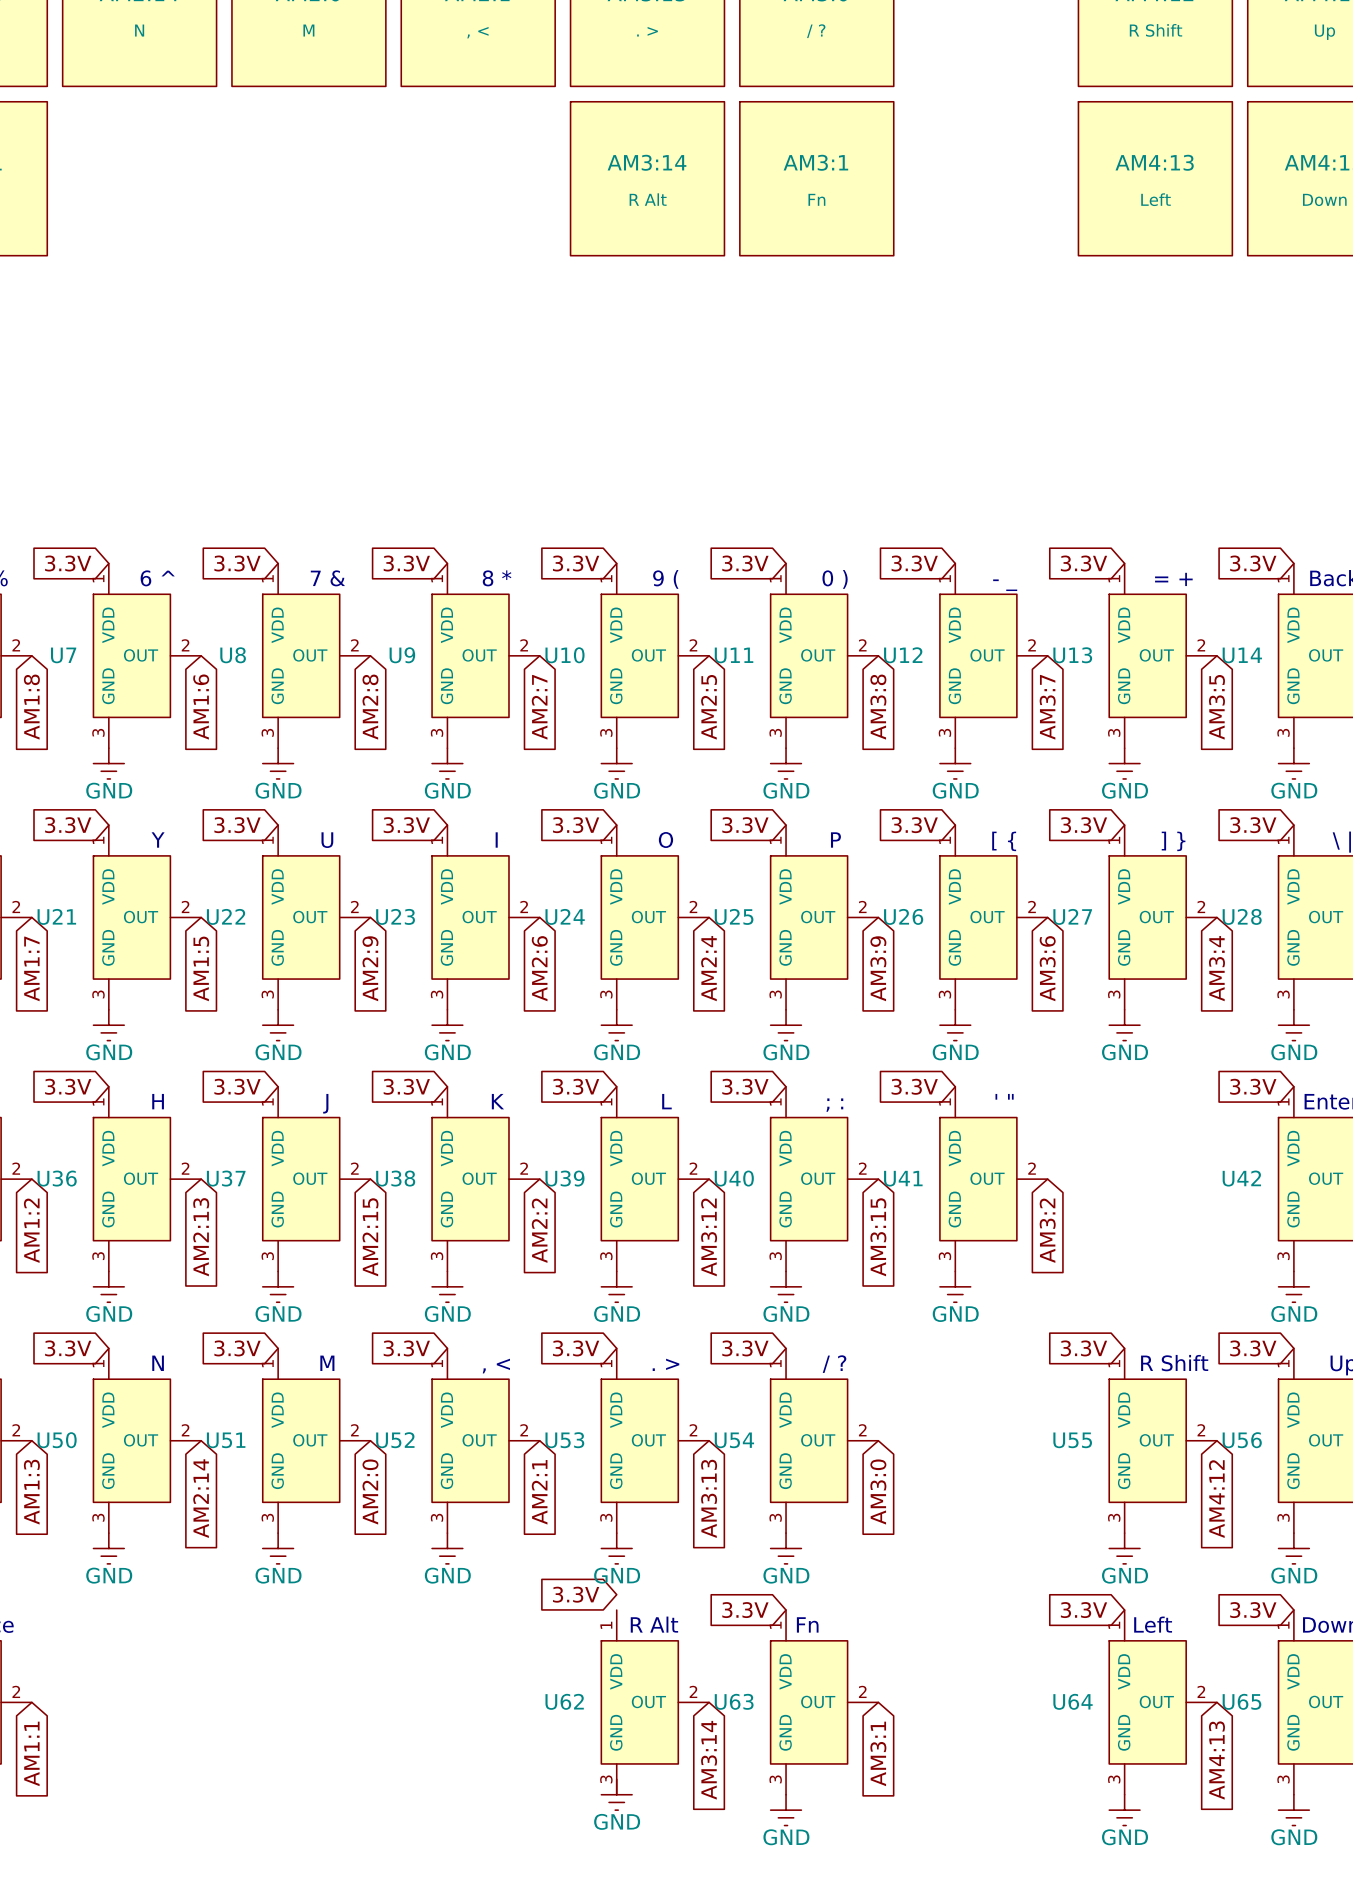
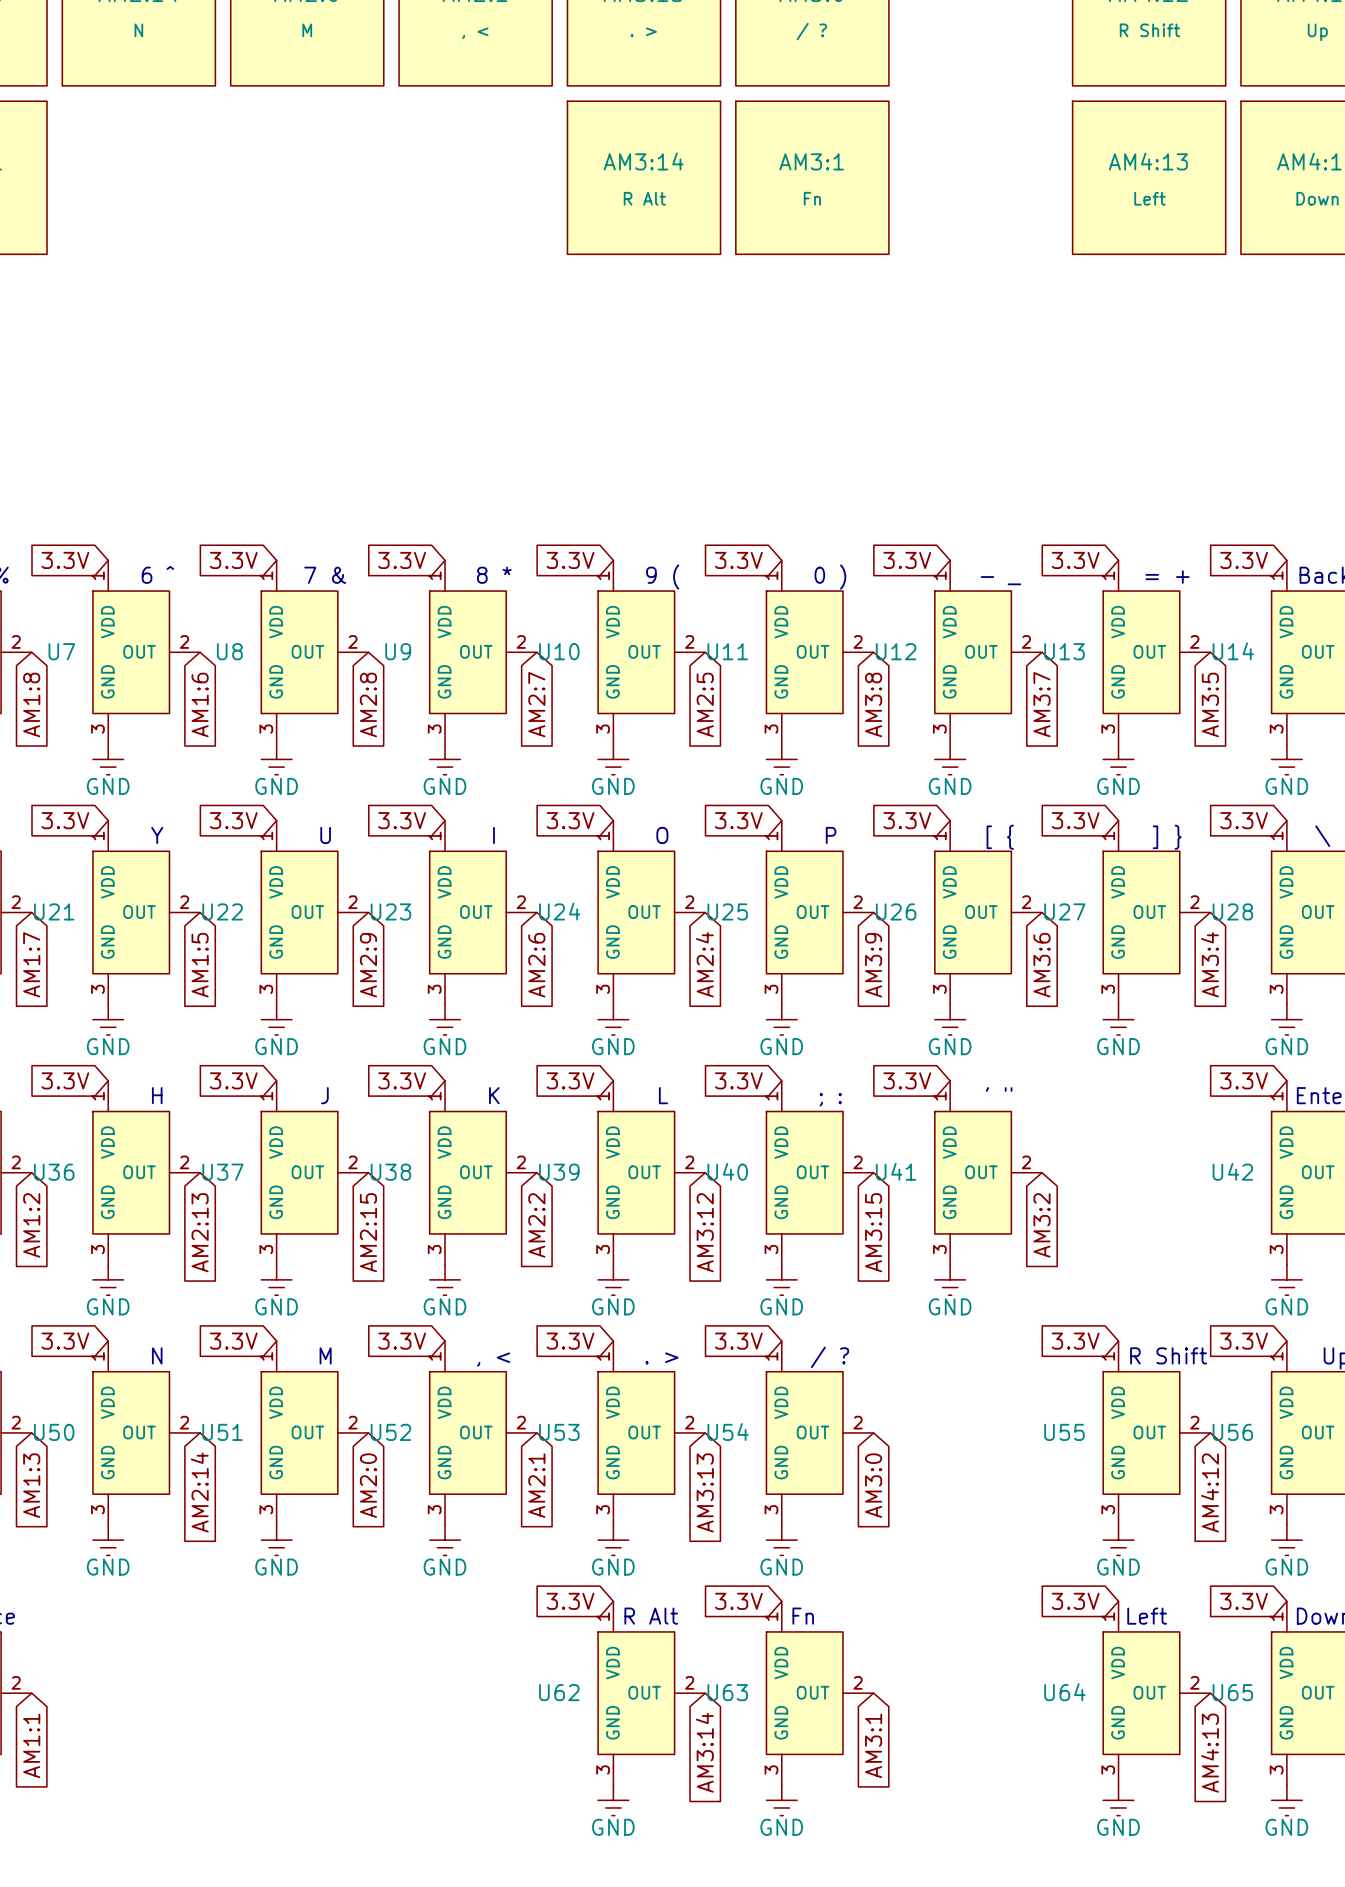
global label position: 3.3V (576, 1594) -> 3.3V (570, 1601)
power symbol position: GND (616, 1794) -> GND (613, 1800)

